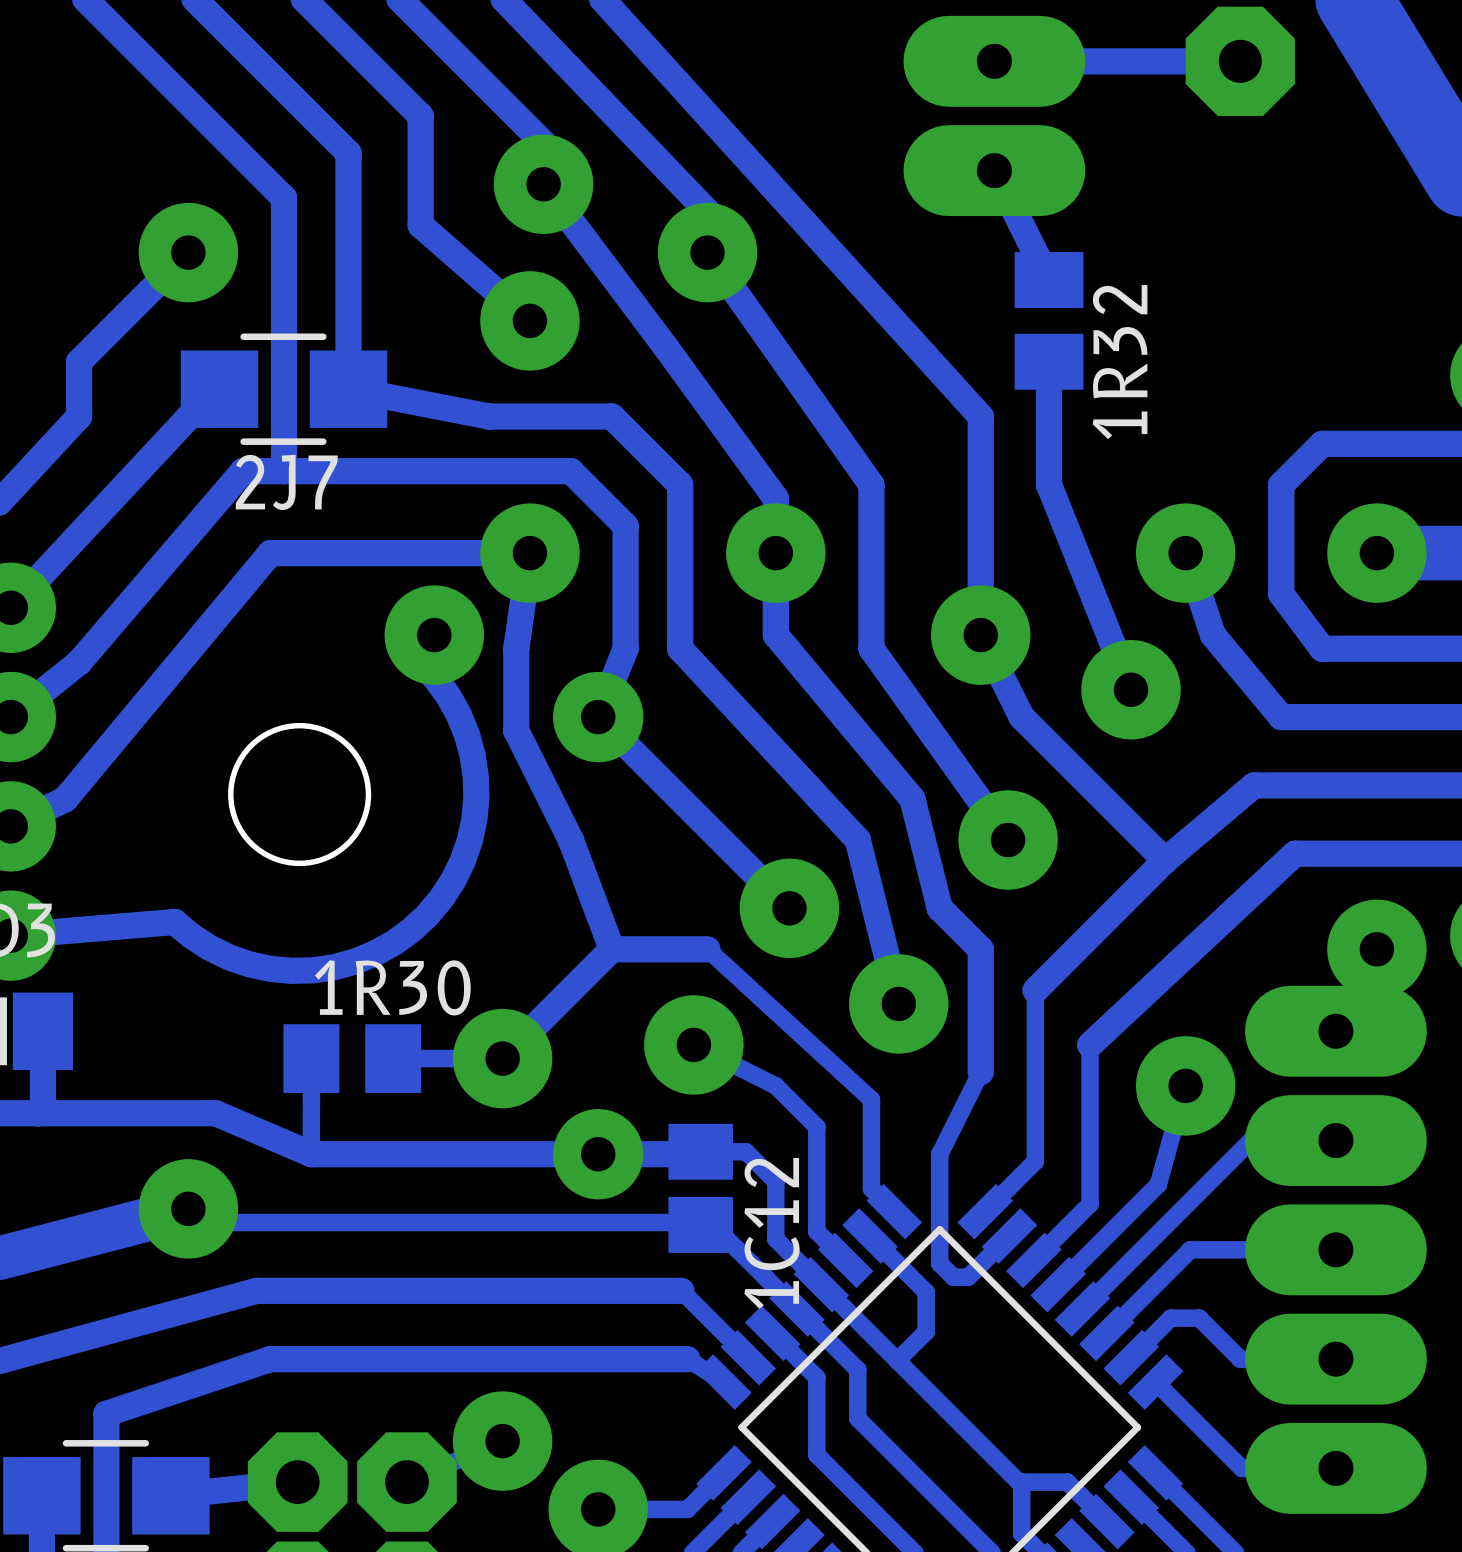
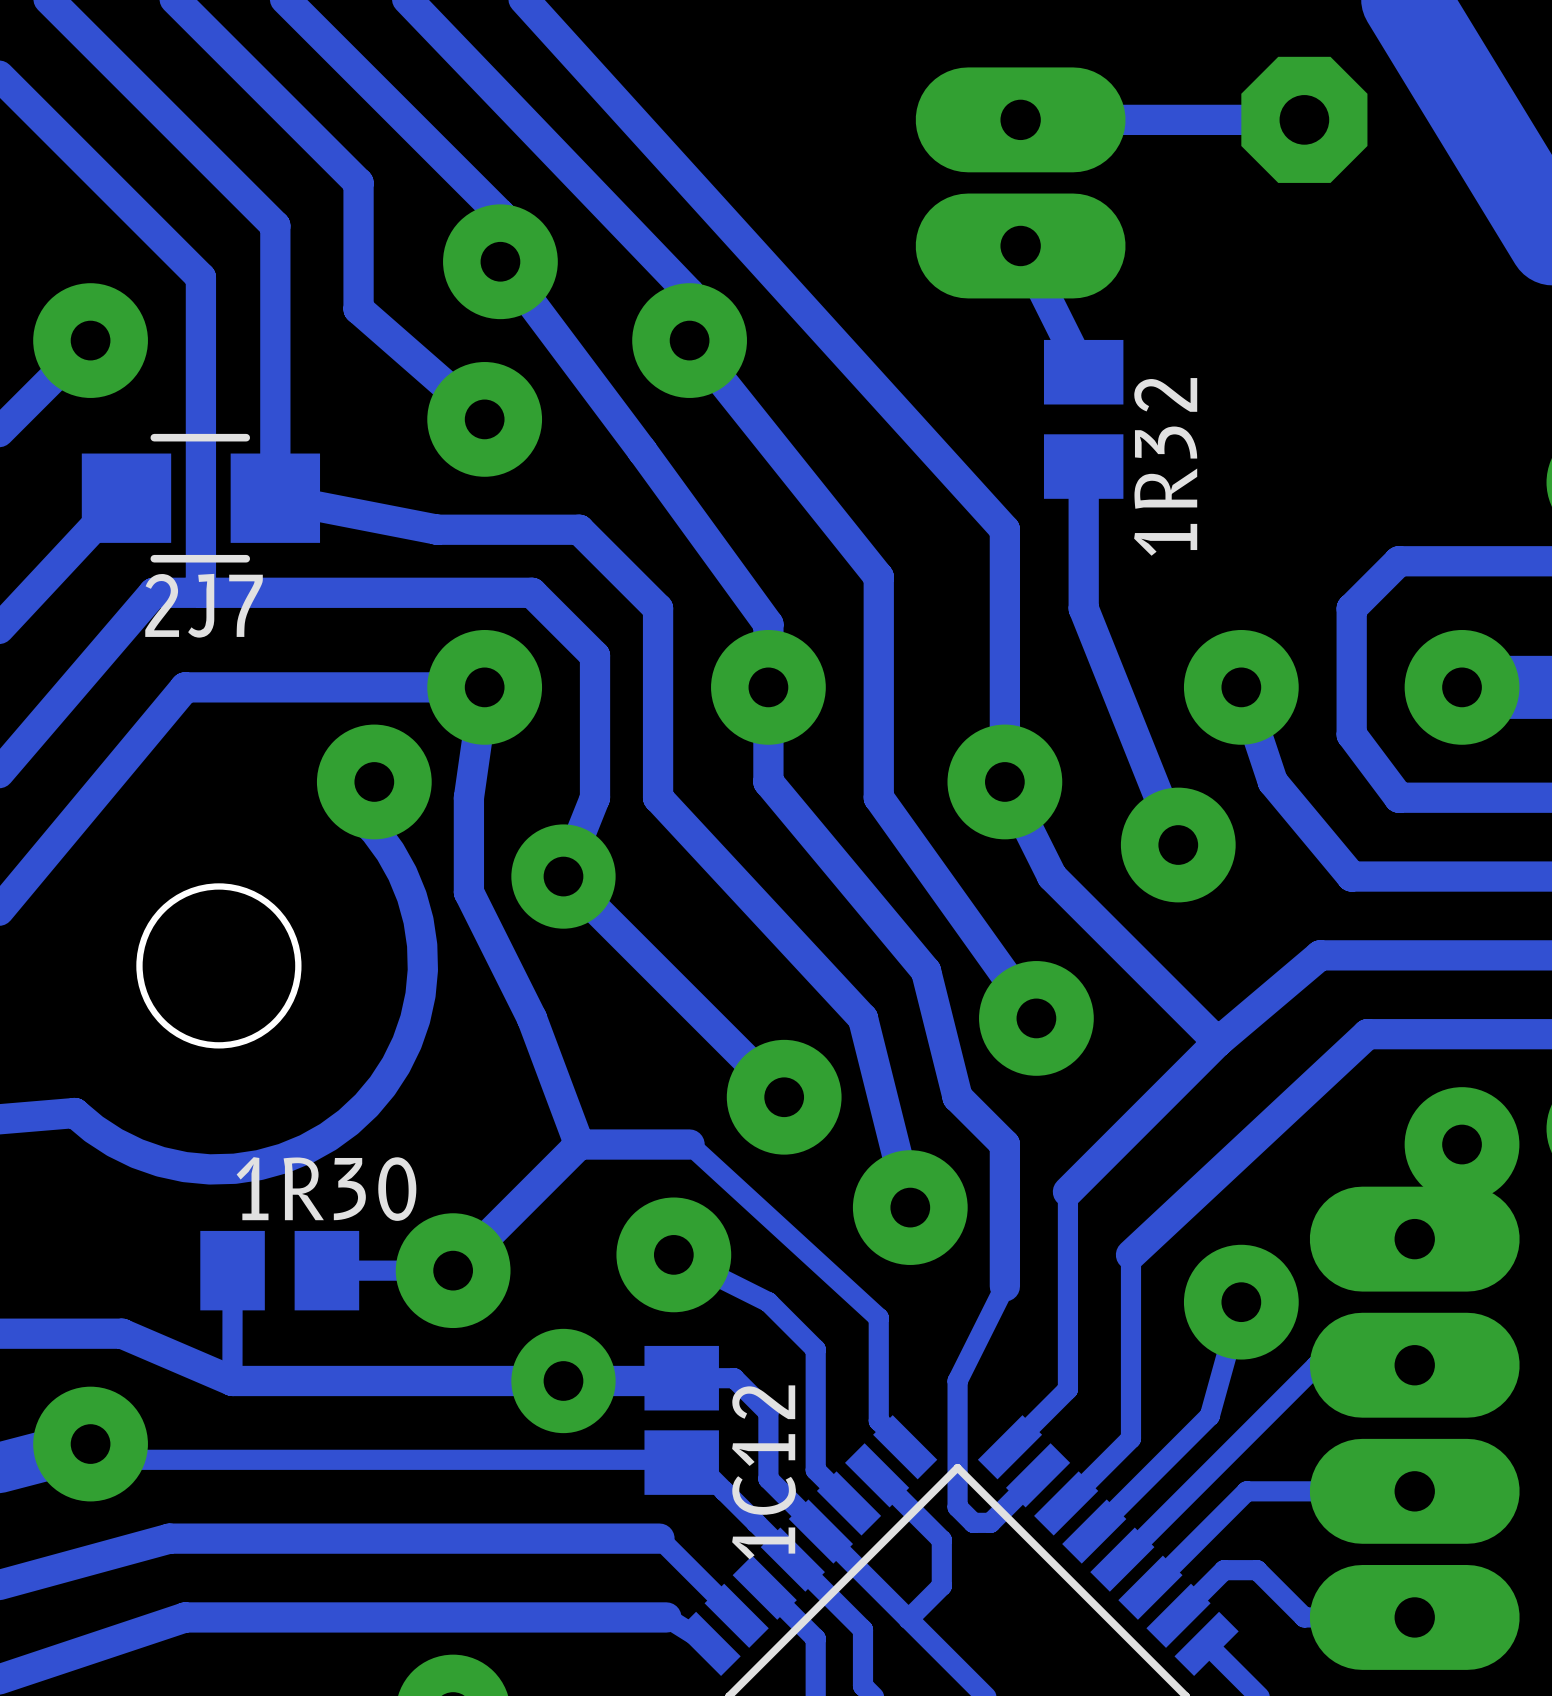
track: (707, 252) (871, 484) -> (689, 340) (878, 577) (878, 608)

